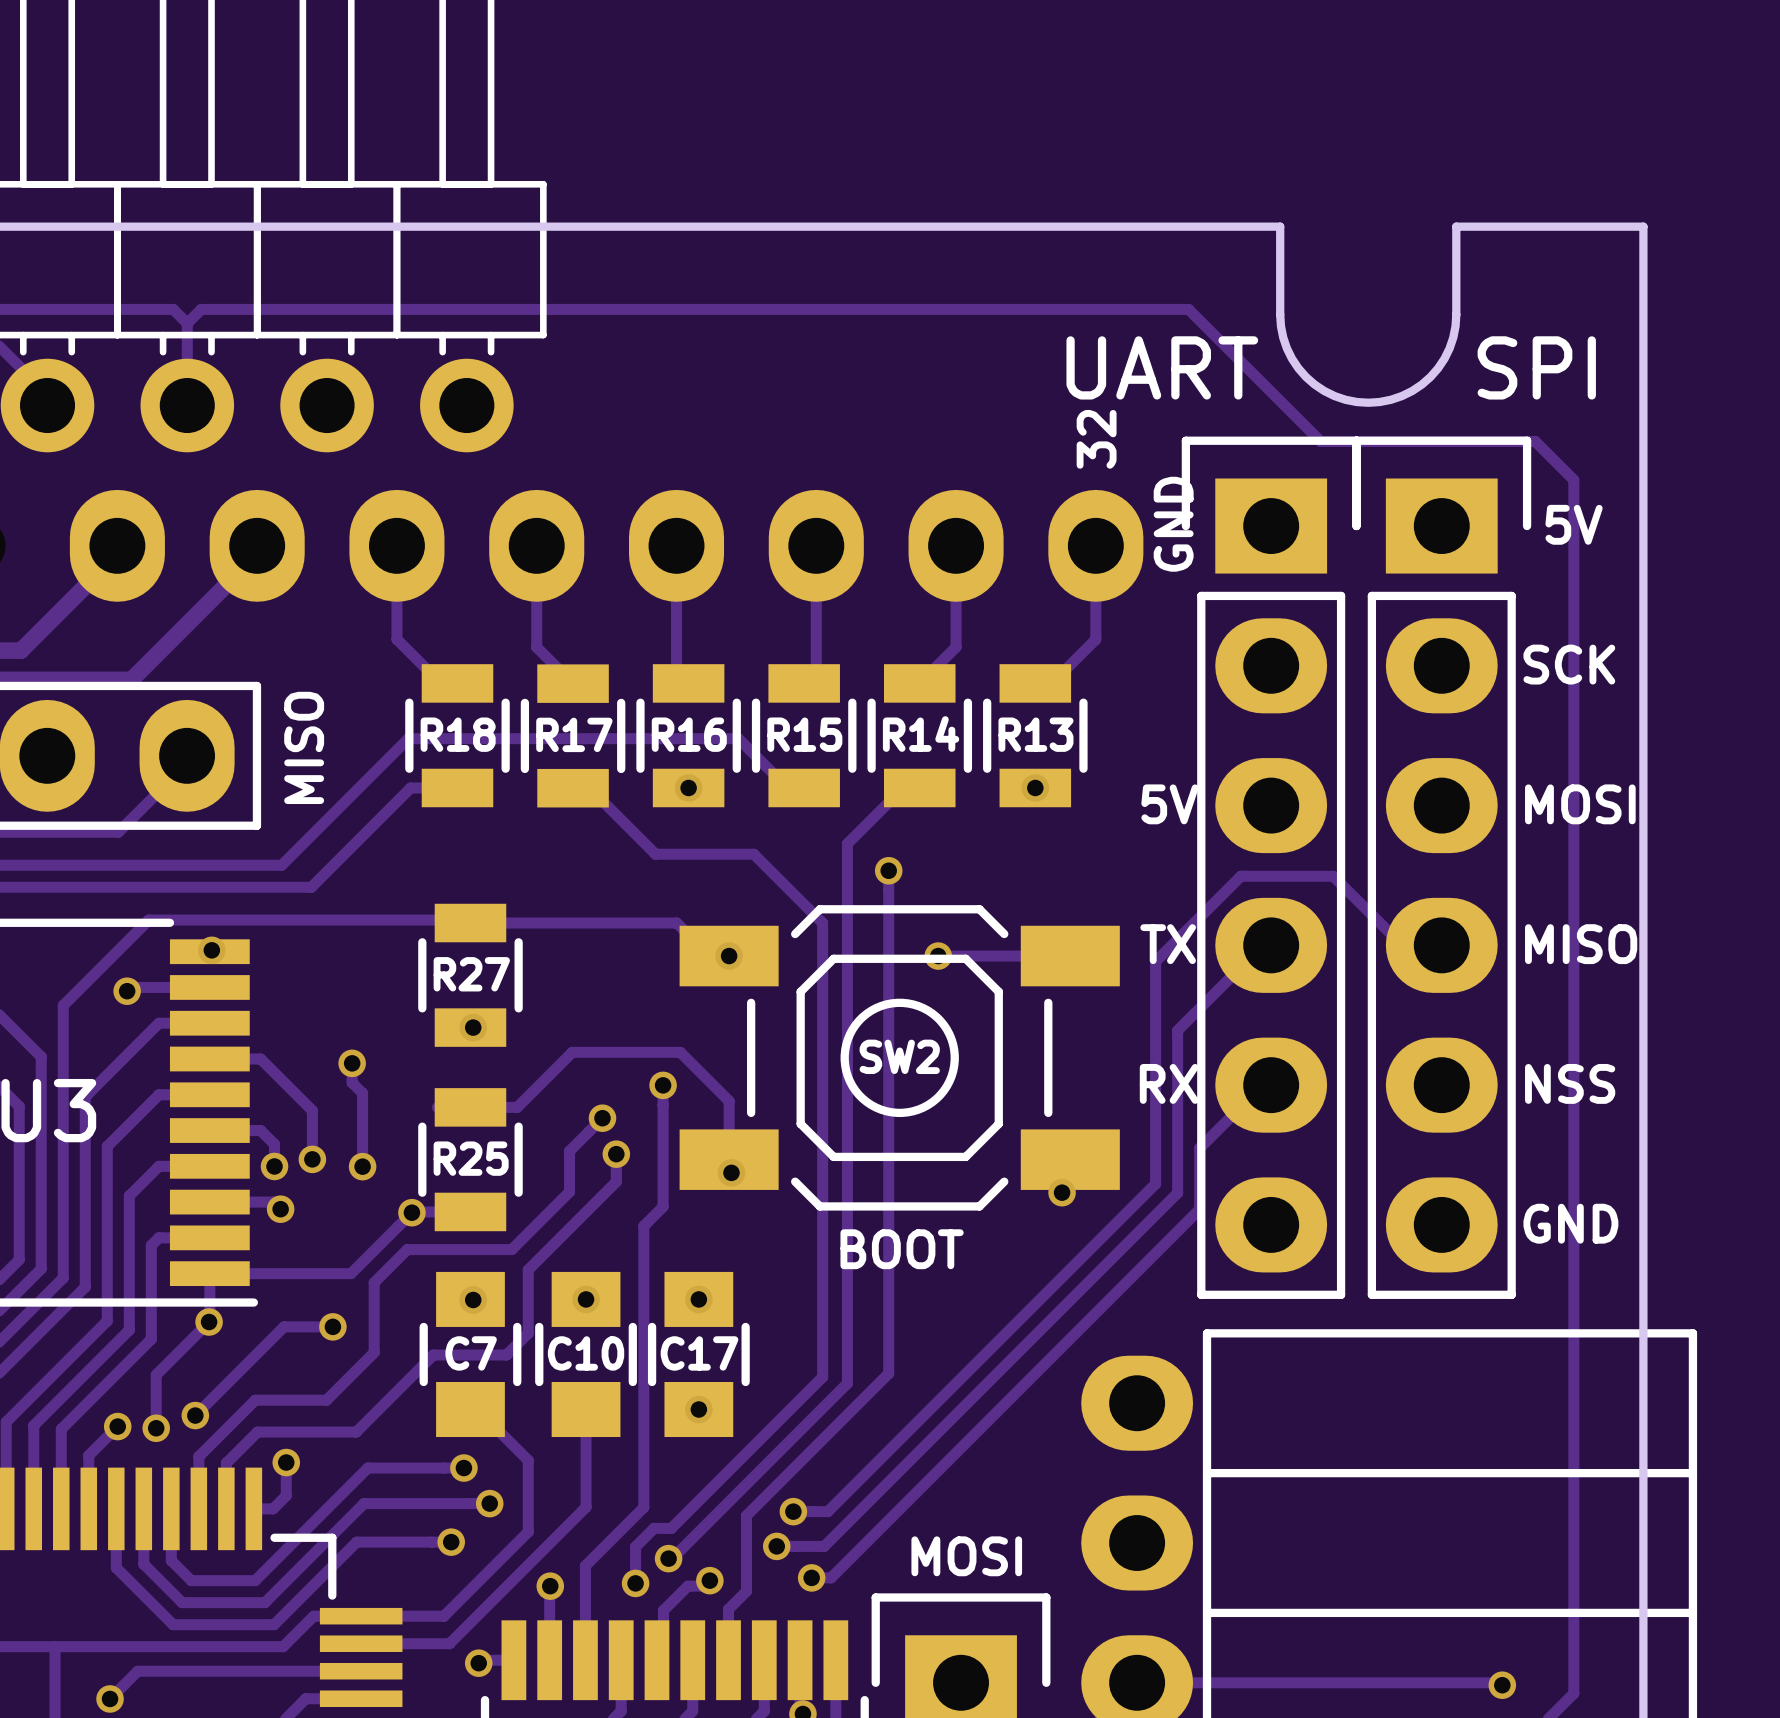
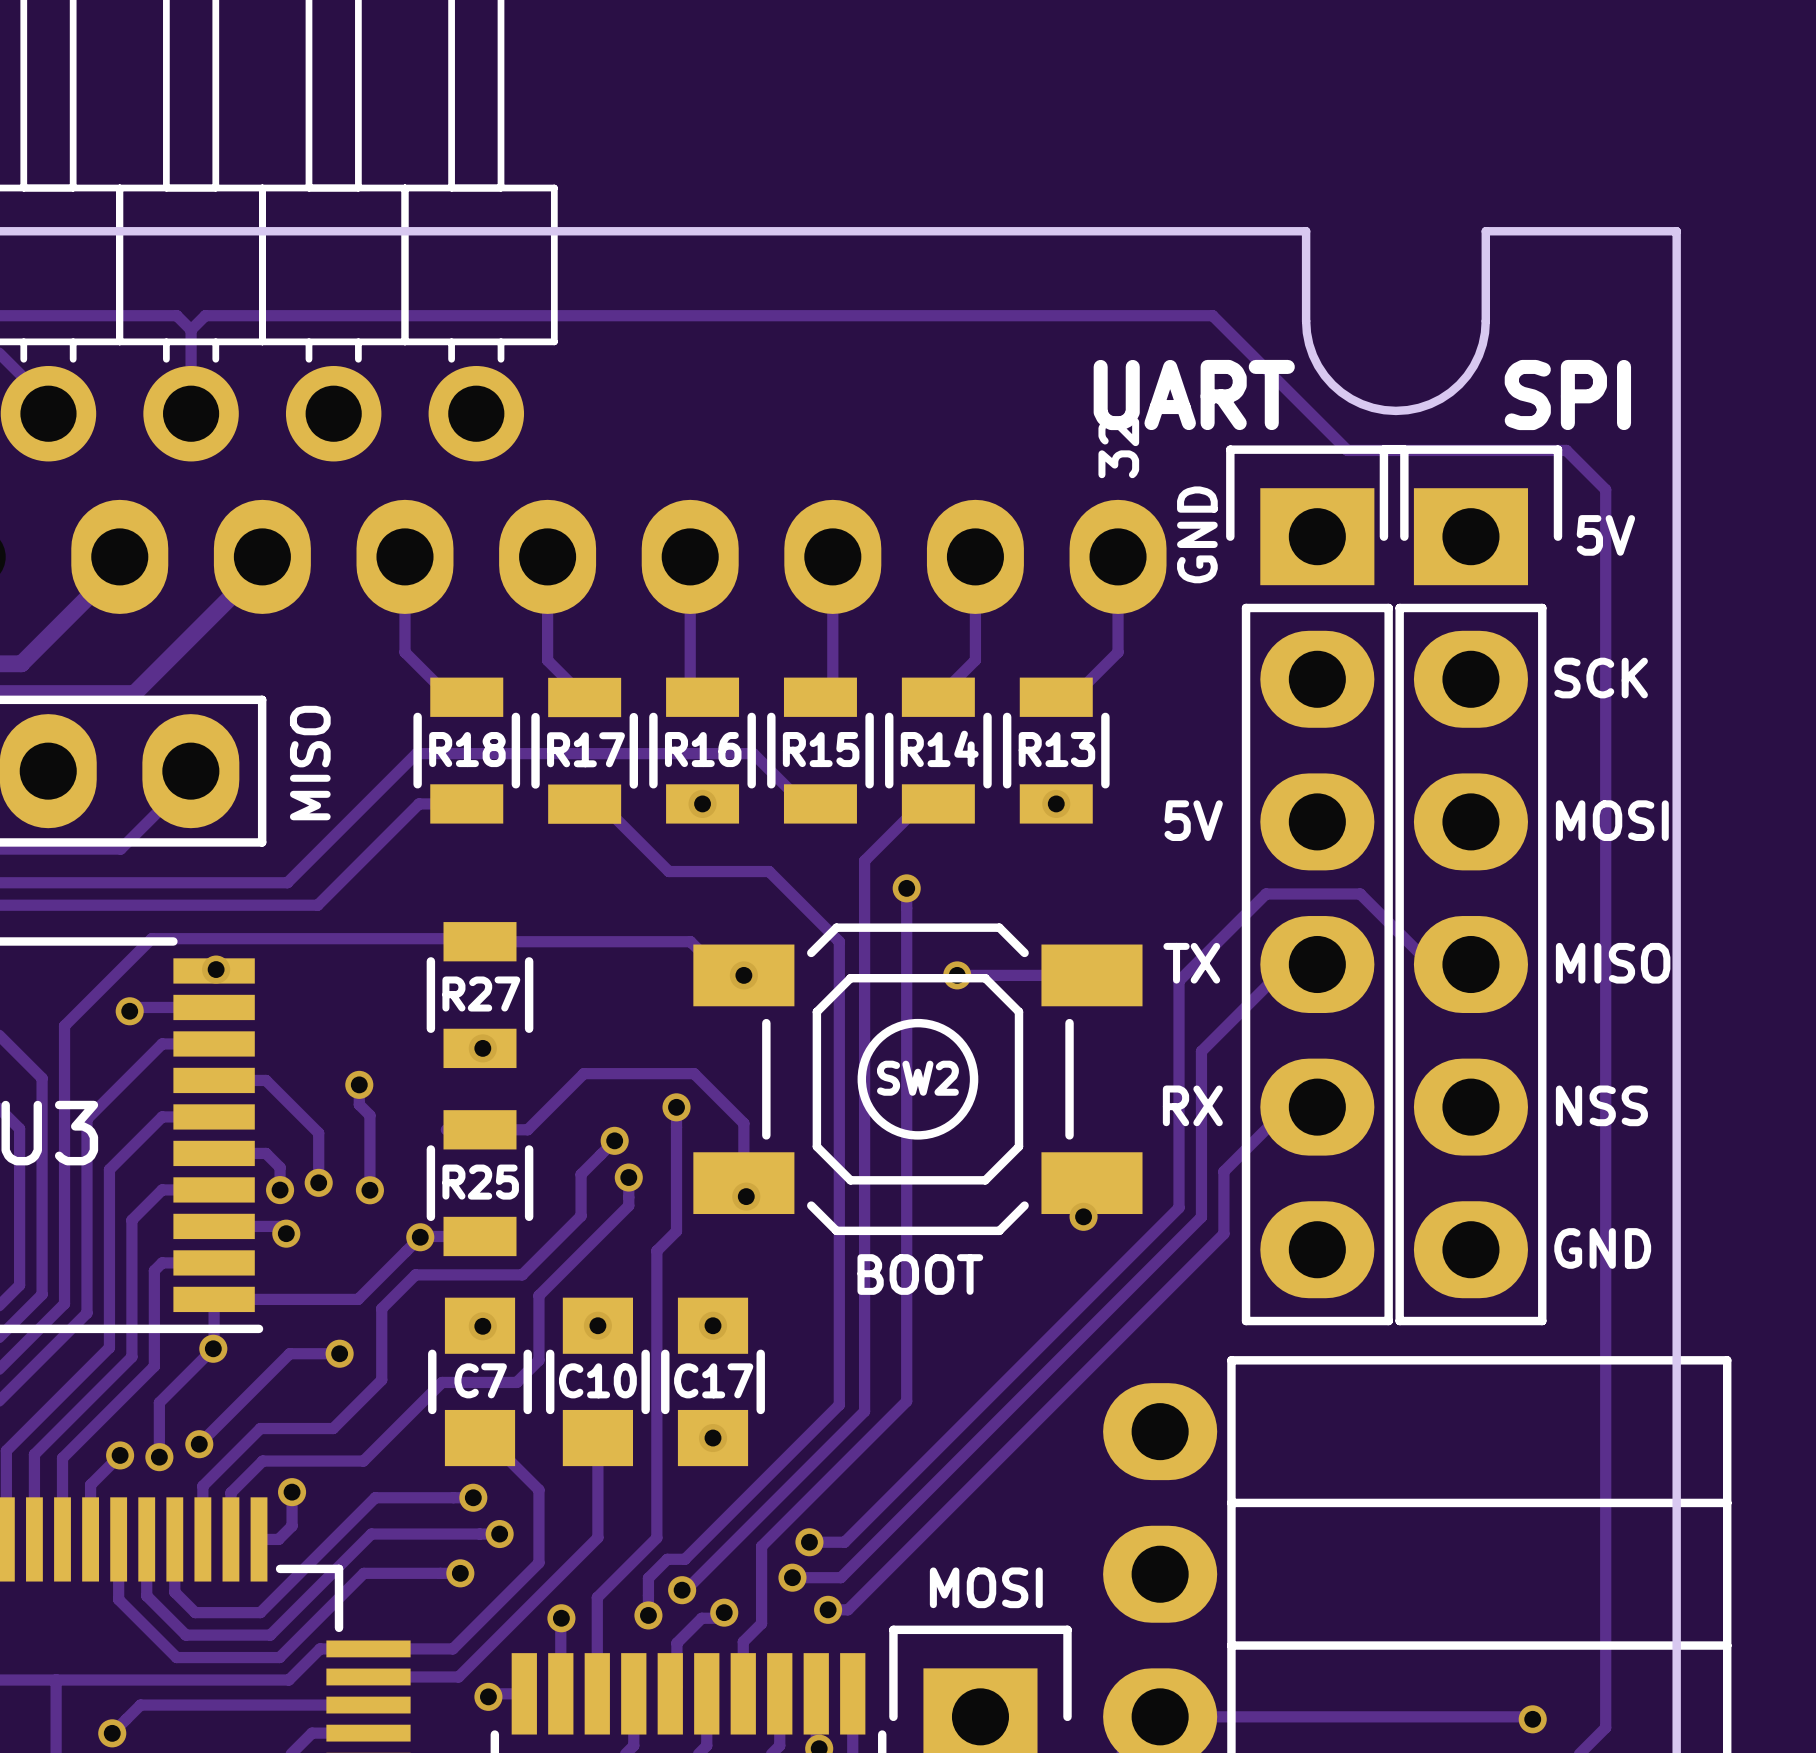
text position: UART (1162, 367) -> UART (1194, 395)
text position: SPI (1536, 367) -> SPI (1567, 395)
part position: (1271, 867) -> (1317, 885)

